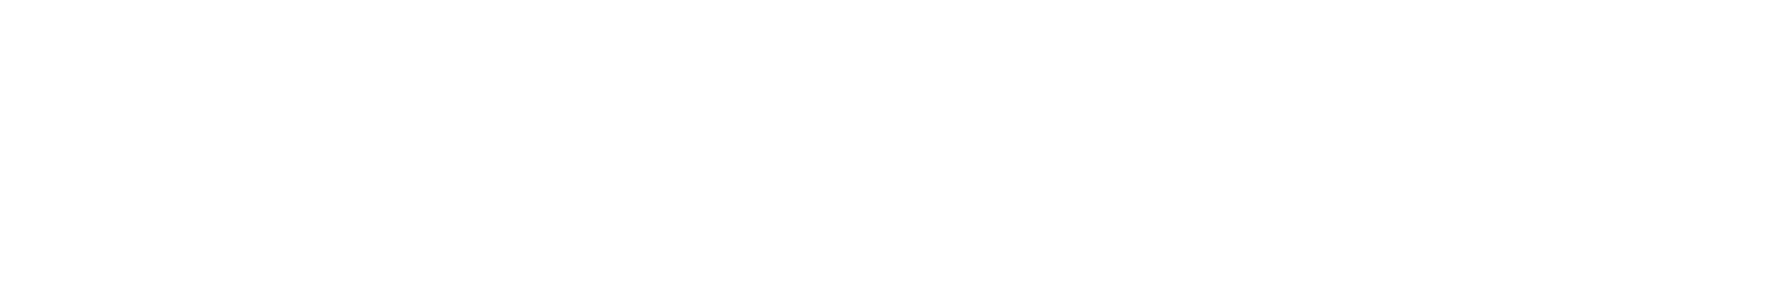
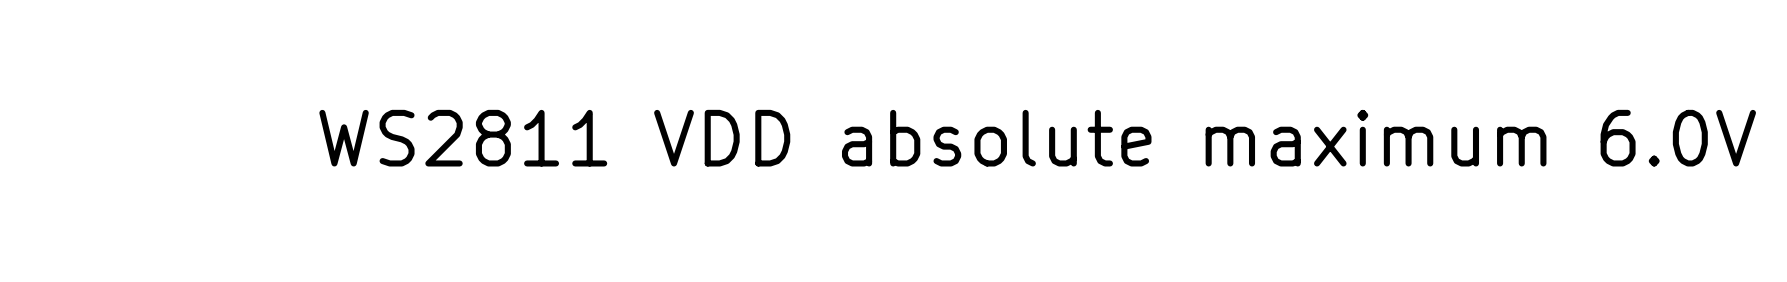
text: none -> WS2811 VDD absolute maximum 6.0V (1037, 138)

